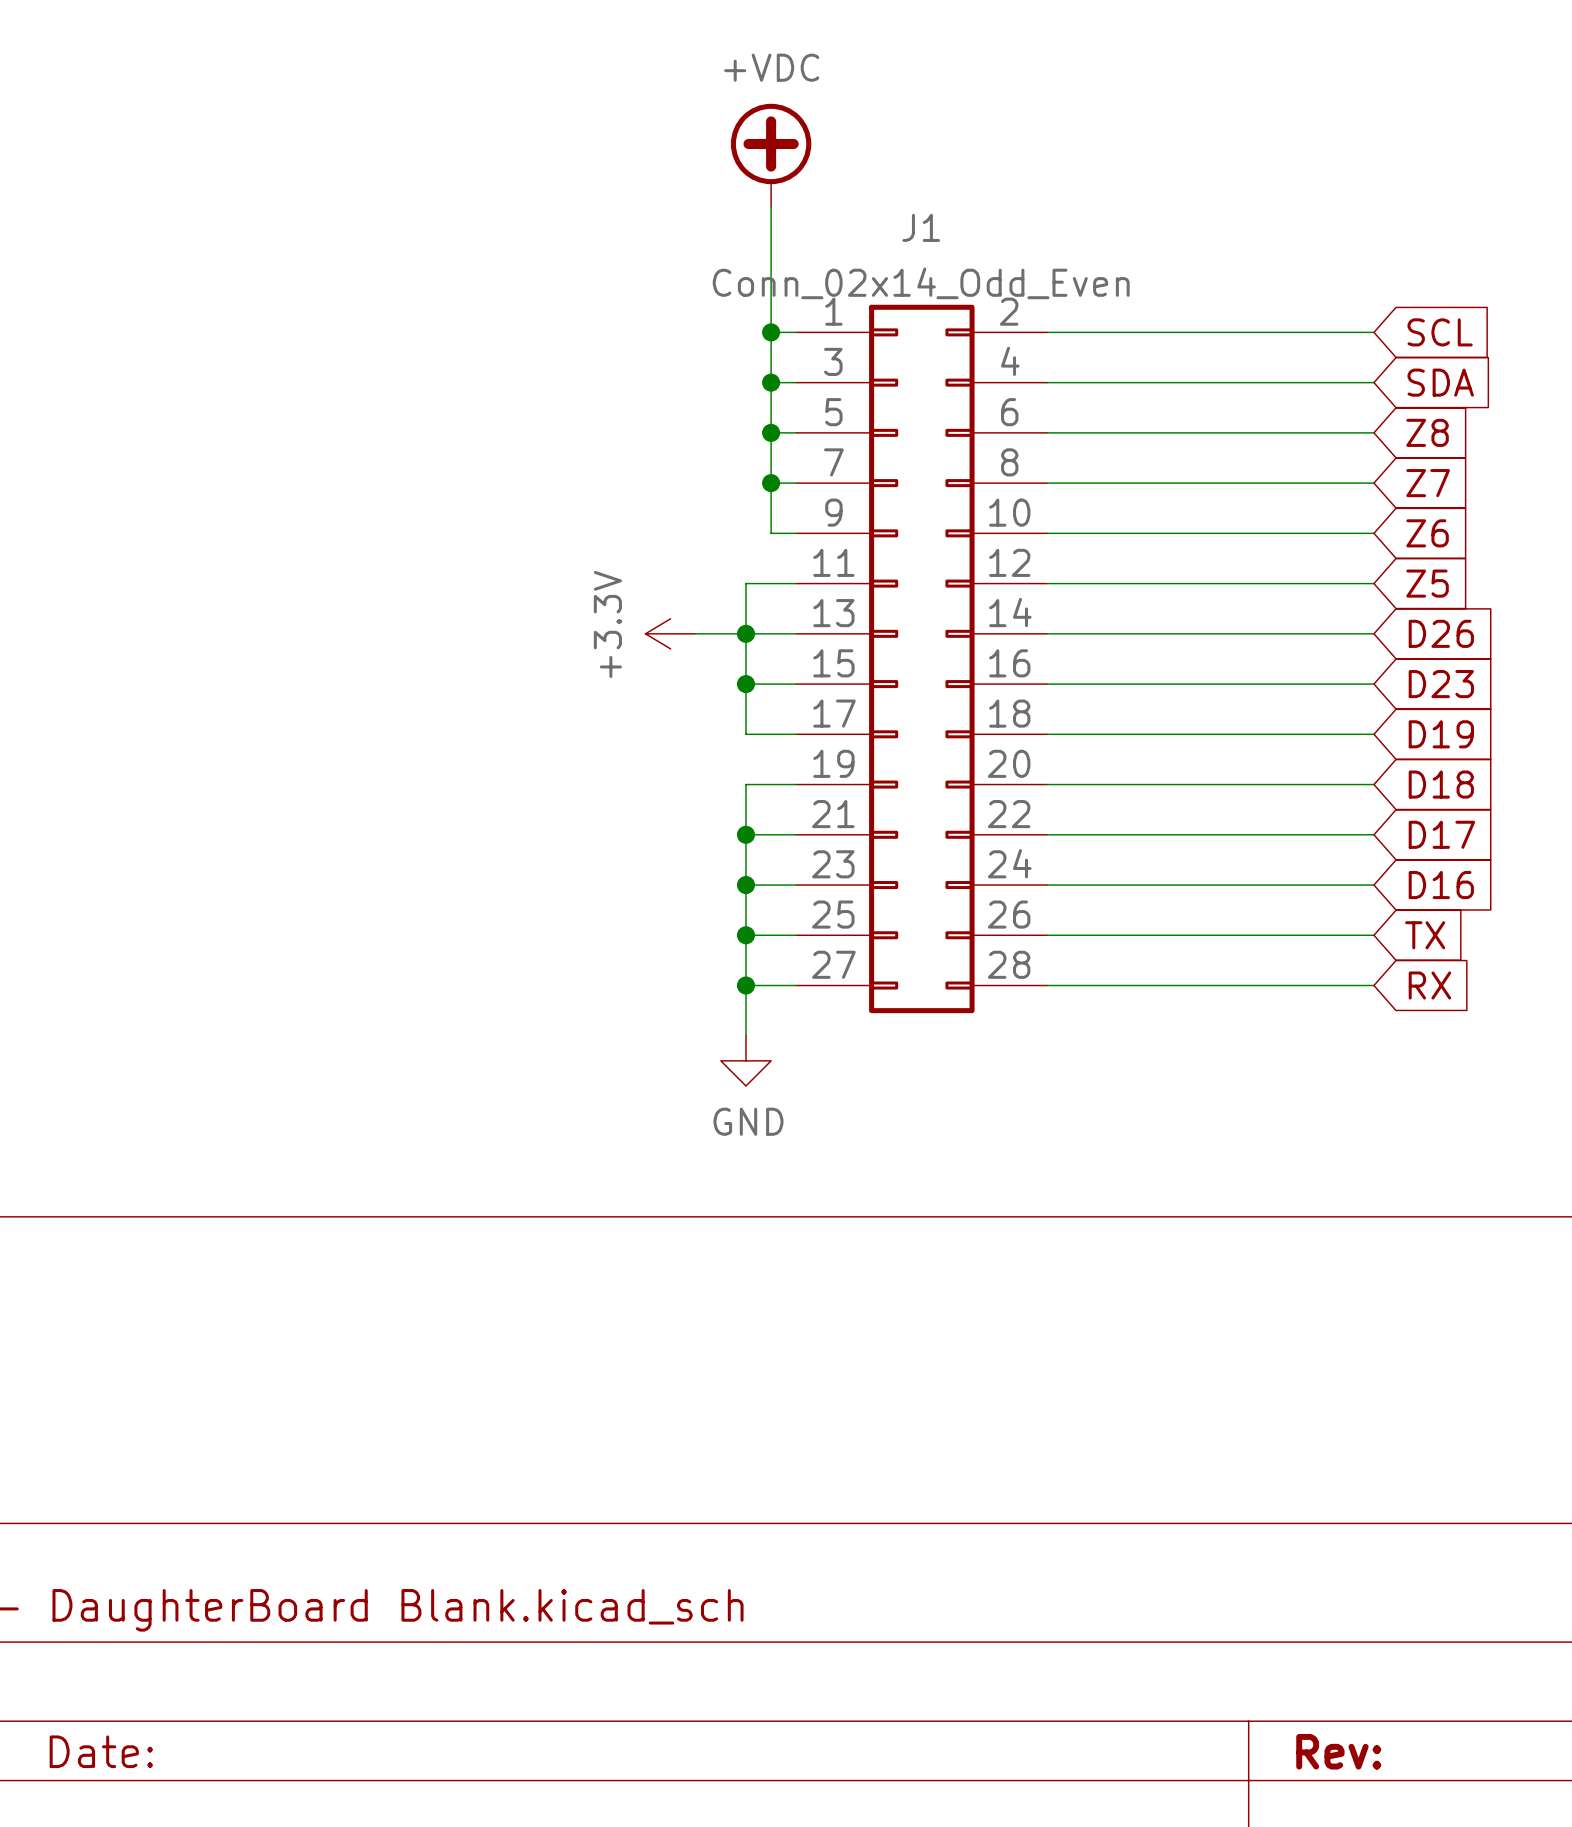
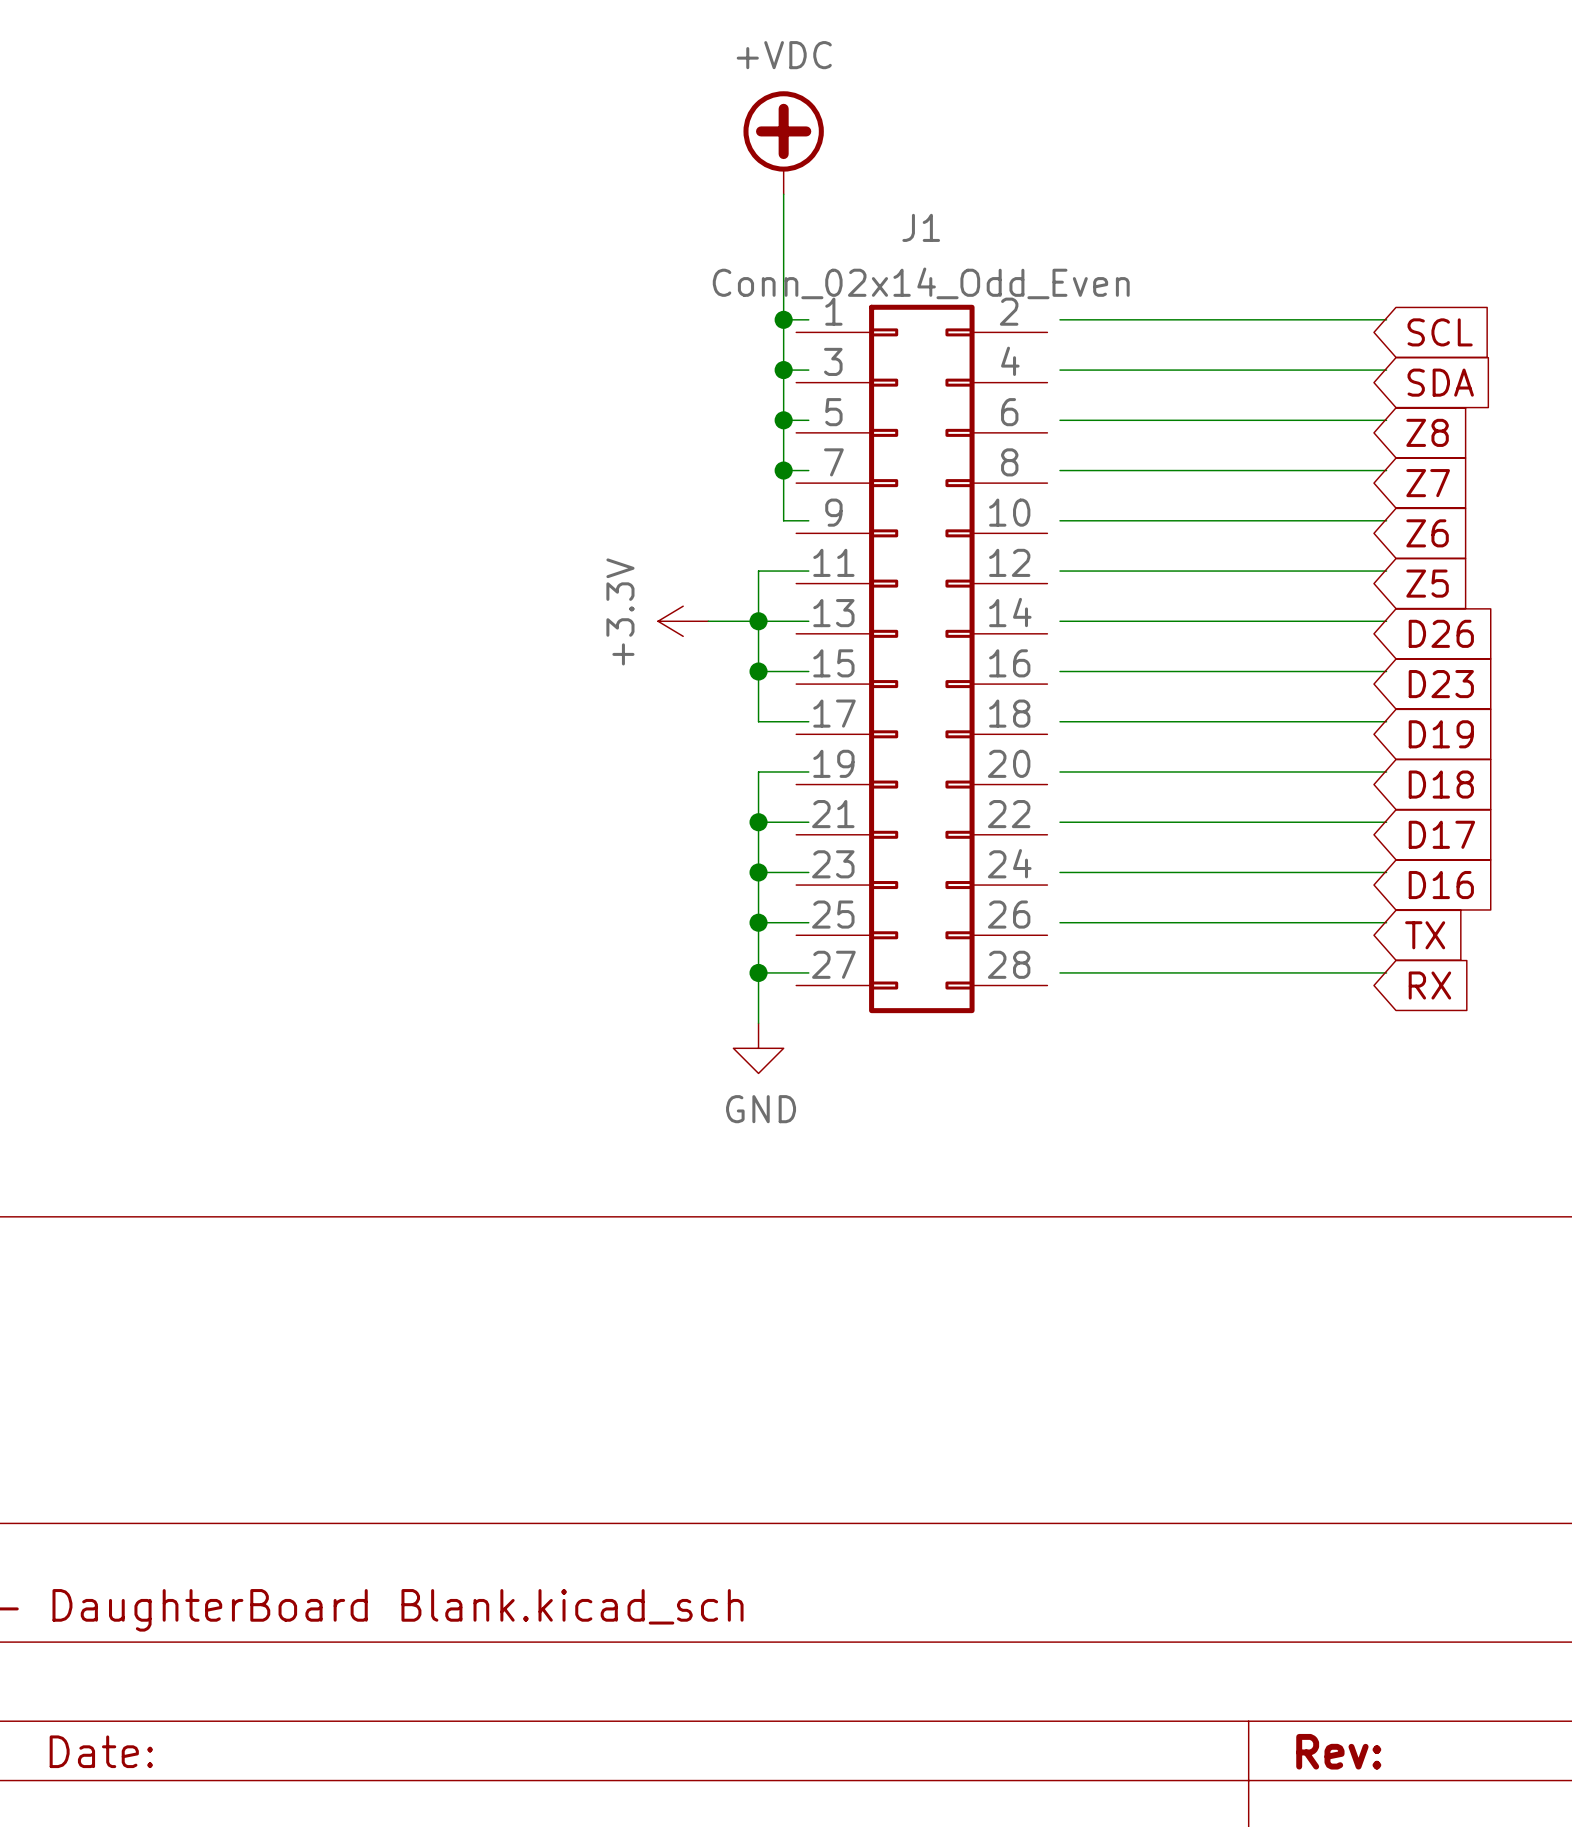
power symbol position: +VDC (771, 155) -> +VDC (783, 142)
wire: (771, 206) (771, 533) (796, 533) -> (783, 194) (783, 520) (808, 520)
wire: (771, 332) (796, 332) -> (783, 319) (808, 319)
junction position: (771, 332) -> (783, 319)
wire: (1047, 332) (1373, 332) -> (1059, 319) (1386, 319)
wire: (771, 382) (796, 382) -> (783, 370) (808, 370)
junction position: (771, 382) -> (783, 370)
wire: (1047, 382) (1373, 382) -> (1059, 370) (1386, 370)
wire: (771, 432) (796, 432) -> (783, 420) (808, 420)
junction position: (771, 432) -> (783, 420)
wire: (1047, 432) (1373, 432) -> (1059, 420) (1386, 420)
wire: (771, 483) (796, 483) -> (783, 470) (808, 470)
junction position: (771, 483) -> (783, 470)
wire: (1047, 483) (1373, 483) -> (1059, 470) (1386, 470)
wire: (1047, 533) (1373, 533) -> (1059, 520) (1386, 520)
wire: (796, 583) (745, 583) (745, 734) (796, 734) -> (808, 571) (758, 571) (758, 721) (808, 721)
wire: (1047, 583) (1373, 583) -> (1059, 571) (1386, 571)
power symbol position: +3.3V (670, 633) -> +3.3V (683, 621)
wire: (695, 633) (796, 633) -> (708, 621) (808, 621)
junction position: (745, 633) -> (758, 621)
wire: (1047, 633) (1373, 633) -> (1059, 621) (1386, 621)
wire: (745, 684) (796, 684) -> (758, 671) (808, 671)
junction position: (745, 684) -> (758, 671)
wire: (1047, 684) (1373, 684) -> (1059, 671) (1386, 671)
wire: (1047, 734) (1373, 734) -> (1059, 721) (1386, 721)
wire: (796, 784) (745, 784) (745, 1035) -> (808, 771) (758, 771) (758, 1023)
wire: (1047, 784) (1373, 784) -> (1059, 771) (1386, 771)
wire: (745, 834) (796, 834) -> (758, 822) (808, 822)
junction position: (745, 834) -> (758, 822)
wire: (1047, 834) (1373, 834) -> (1059, 822) (1386, 822)
wire: (745, 885) (796, 885) -> (758, 872) (808, 872)
junction position: (745, 885) -> (758, 872)
wire: (1047, 885) (1373, 885) -> (1059, 872) (1386, 872)
wire: (745, 935) (796, 935) -> (758, 922) (808, 922)
junction position: (745, 935) -> (758, 922)
wire: (1047, 935) (1373, 935) -> (1059, 922) (1386, 922)
wire: (745, 985) (796, 985) -> (758, 972) (808, 972)
junction position: (745, 985) -> (758, 972)
wire: (1047, 985) (1373, 985) -> (1059, 972) (1386, 972)
power symbol position: GND (745, 1060) -> GND (758, 1048)

